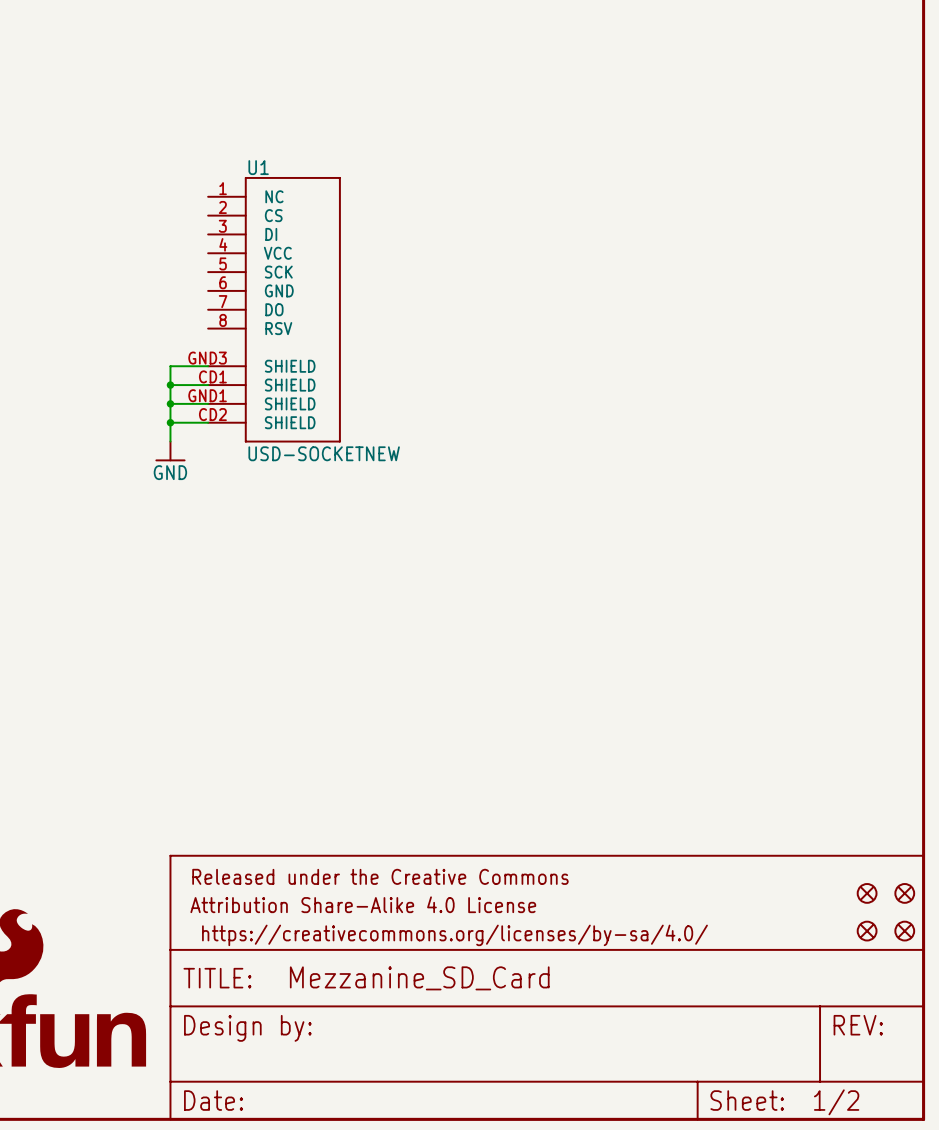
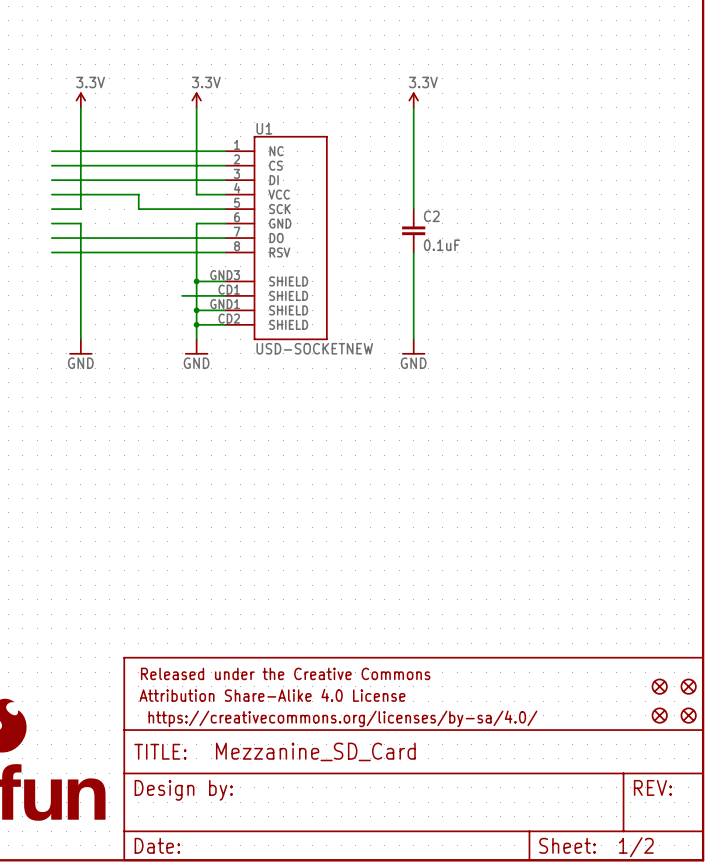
power symbol: none -> 3.3V (80, 100)
power symbol: none -> 3.3V (196, 100)
power symbol: none -> 3.3V (413, 100)
wire: none -> (80, 107) (80, 209) (51, 209)
wire: none -> (196, 107) (196, 194) (225, 194)
wire: none -> (413, 107) (413, 209)
wire: none -> (51, 151) (225, 151)
wire: none -> (51, 165) (225, 165)
wire: none -> (51, 180) (225, 180)
wire: none -> (51, 194) (138, 194) (138, 209) (225, 209)
wire: none -> (51, 223) (80, 223) (80, 339)
wire: none -> (225, 223) (196, 223) (196, 339)
C2: none -> 0.1uF (413, 230)
wire: none -> (51, 238) (225, 238)
U1 position: (274, 309) -> (276, 238)
wire: none -> (51, 252) (225, 252)
wire: none -> (413, 252) (413, 339)
wire: (208, 366) (170, 366) (170, 441) -> none
junction: none -> (196, 281)
wire: (170, 385) (208, 385) -> (196, 281) (225, 281)
junction: (170, 385) -> none
wire: none -> (182, 295) (225, 295)
wire: (170, 403) (208, 403) -> (196, 310) (225, 310)
junction: (170, 403) -> none
junction: none -> (196, 310)
wire: (170, 422) (208, 422) -> (196, 324) (225, 324)
junction: (170, 422) -> none
junction: none -> (196, 324)
power symbol: none -> GND (80, 346)
power symbol: GND (170, 451) -> none
power symbol: none -> GND (196, 346)
power symbol: none -> GND (413, 346)

